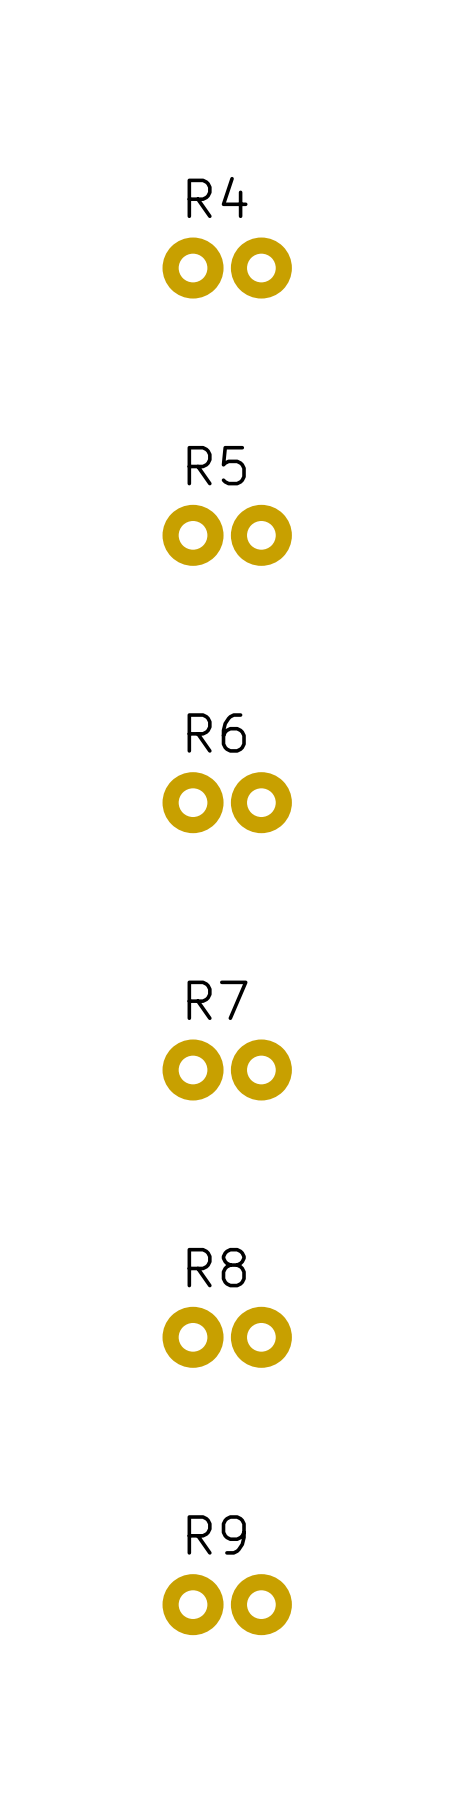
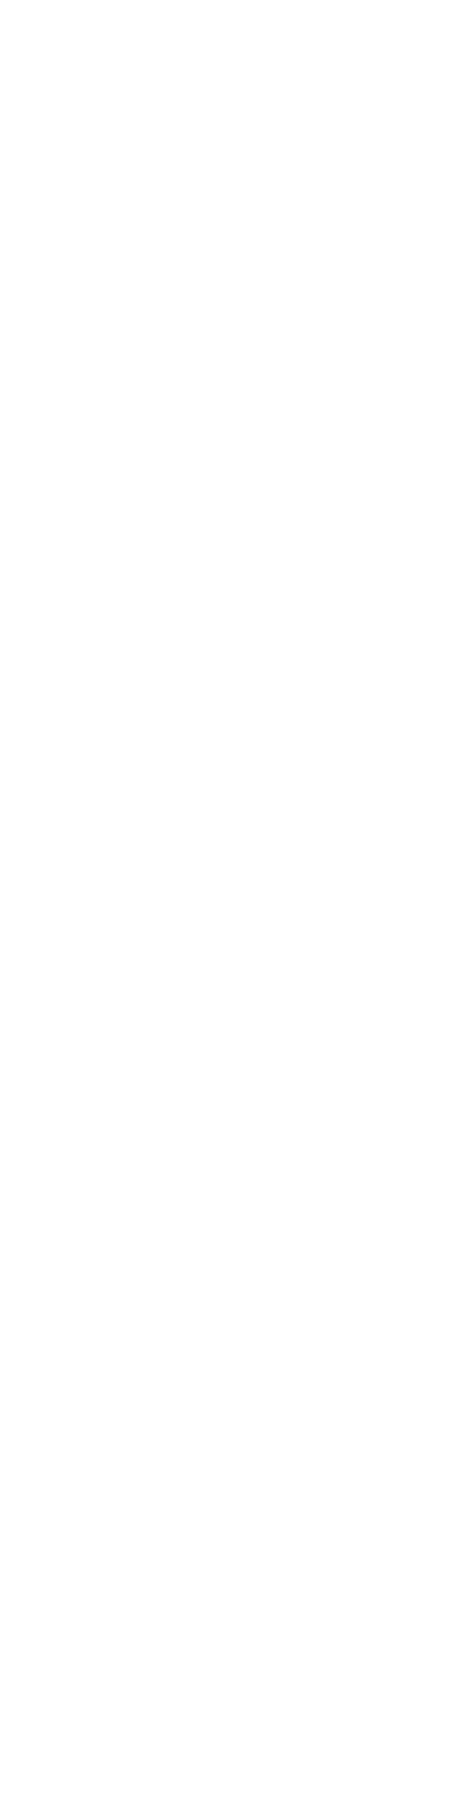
R4: (227, 268) -> none
R5: (227, 535) -> none
R6: (227, 802) -> none
R7: (227, 1070) -> none
R8: (227, 1337) -> none
R9: (227, 1604) -> none

